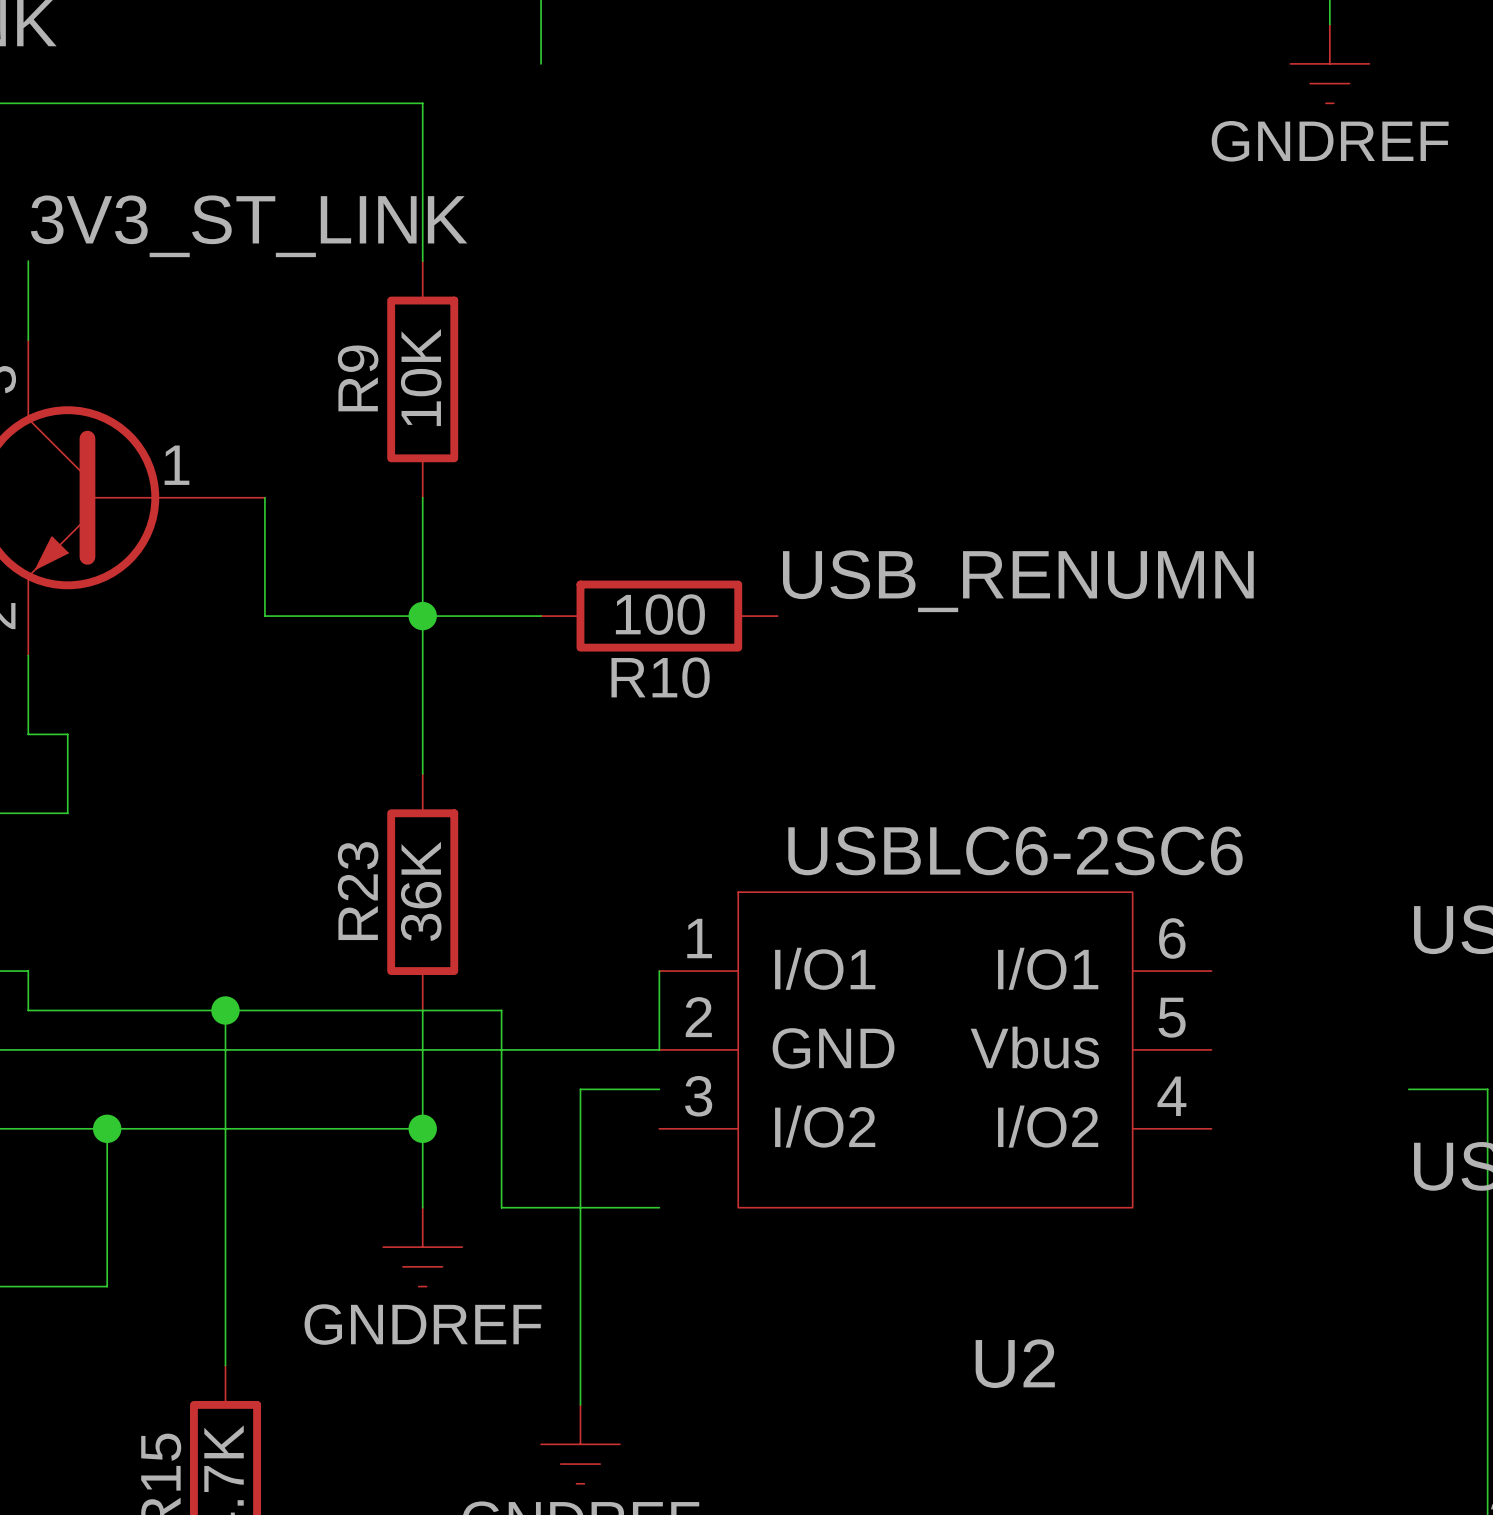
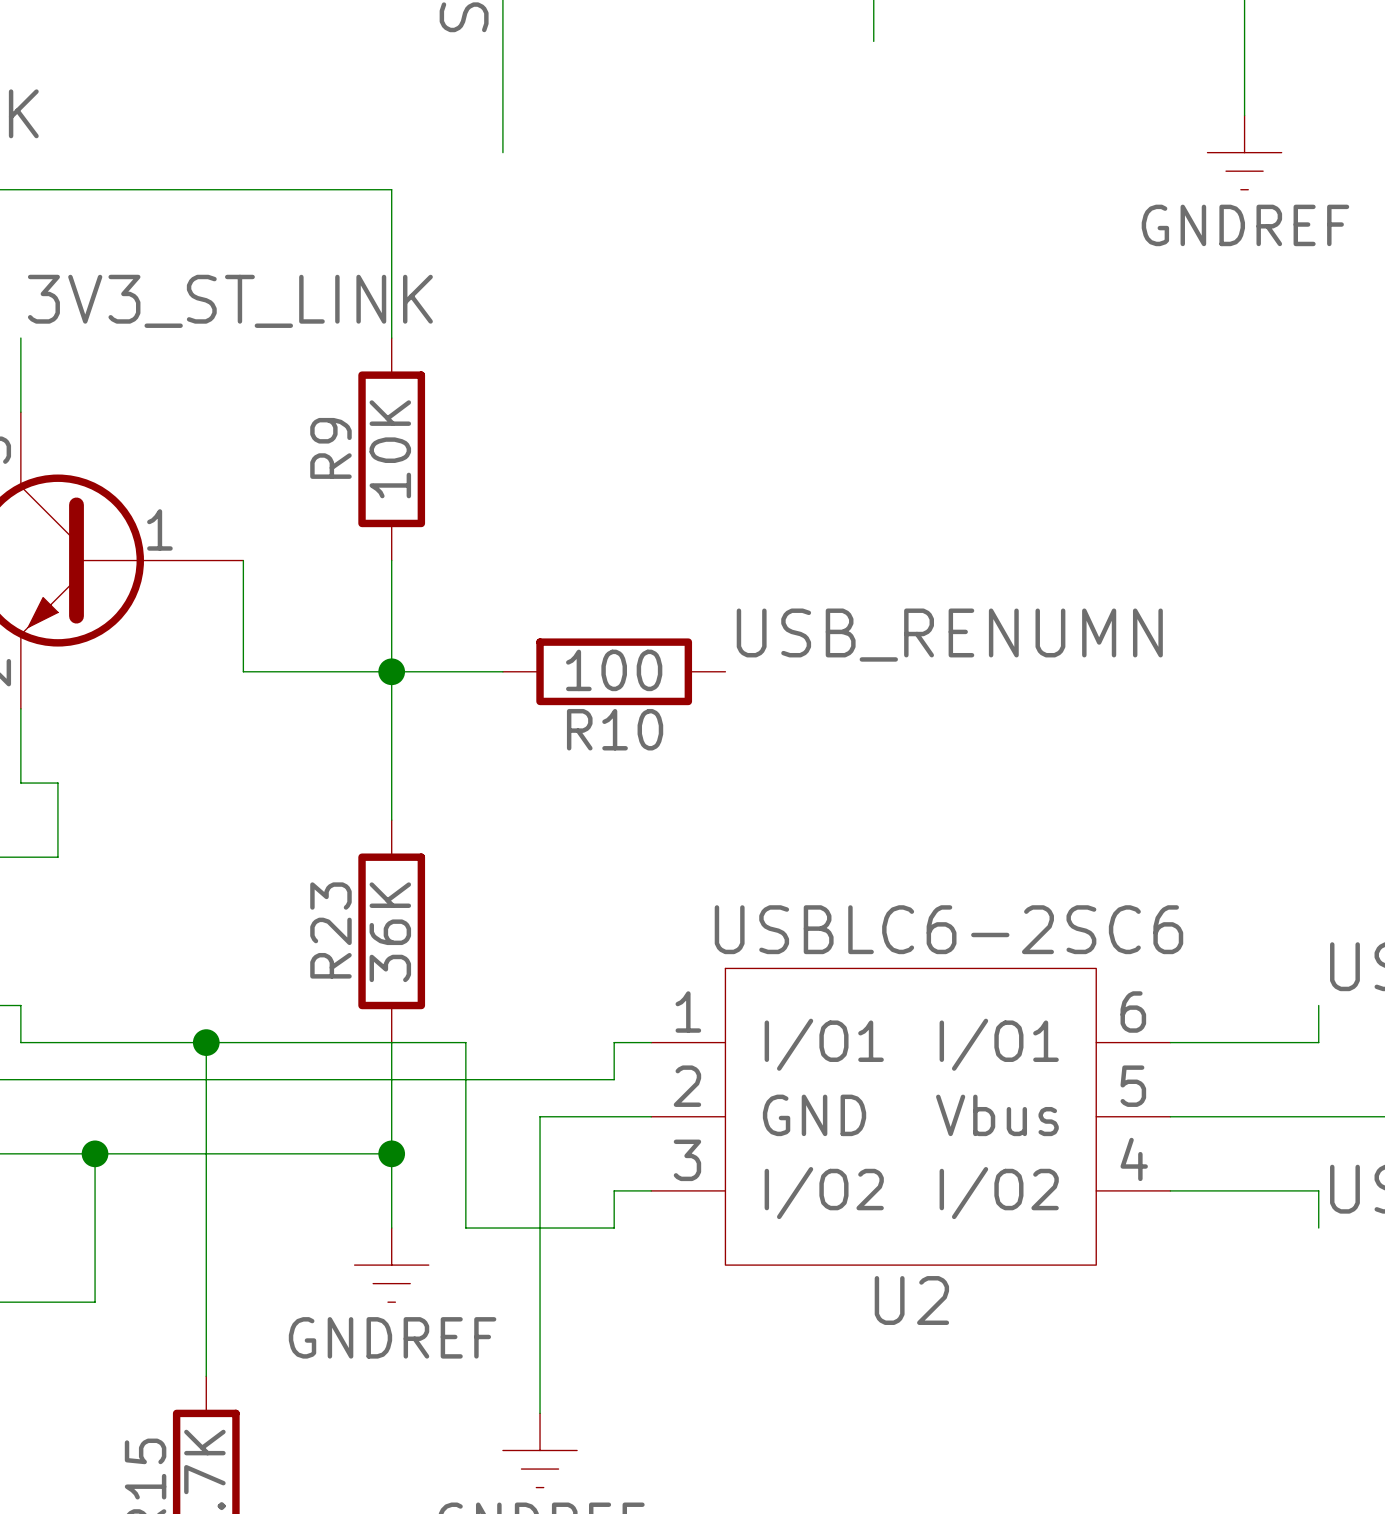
U2 value position: USBLC6-2SC6 (1015, 850) -> USBLC6-2SC6 (948, 929)
wire: (659, 971) (659, 1010) -> (651, 1042) (614, 1042)
wire: none -> (1318, 1005) (1318, 1042) (1170, 1042)
U2 position: (935, 1049) -> (910, 1116)
wire: none -> (614, 1116) (651, 1116)
wire: none -> (1170, 1116) (1318, 1116)
wire: none -> (651, 1190) (614, 1190) (614, 1228)
wire: none -> (1170, 1190) (1318, 1190) (1318, 1228)
U2 name position: U2 (1015, 1363) -> U2 (911, 1300)

